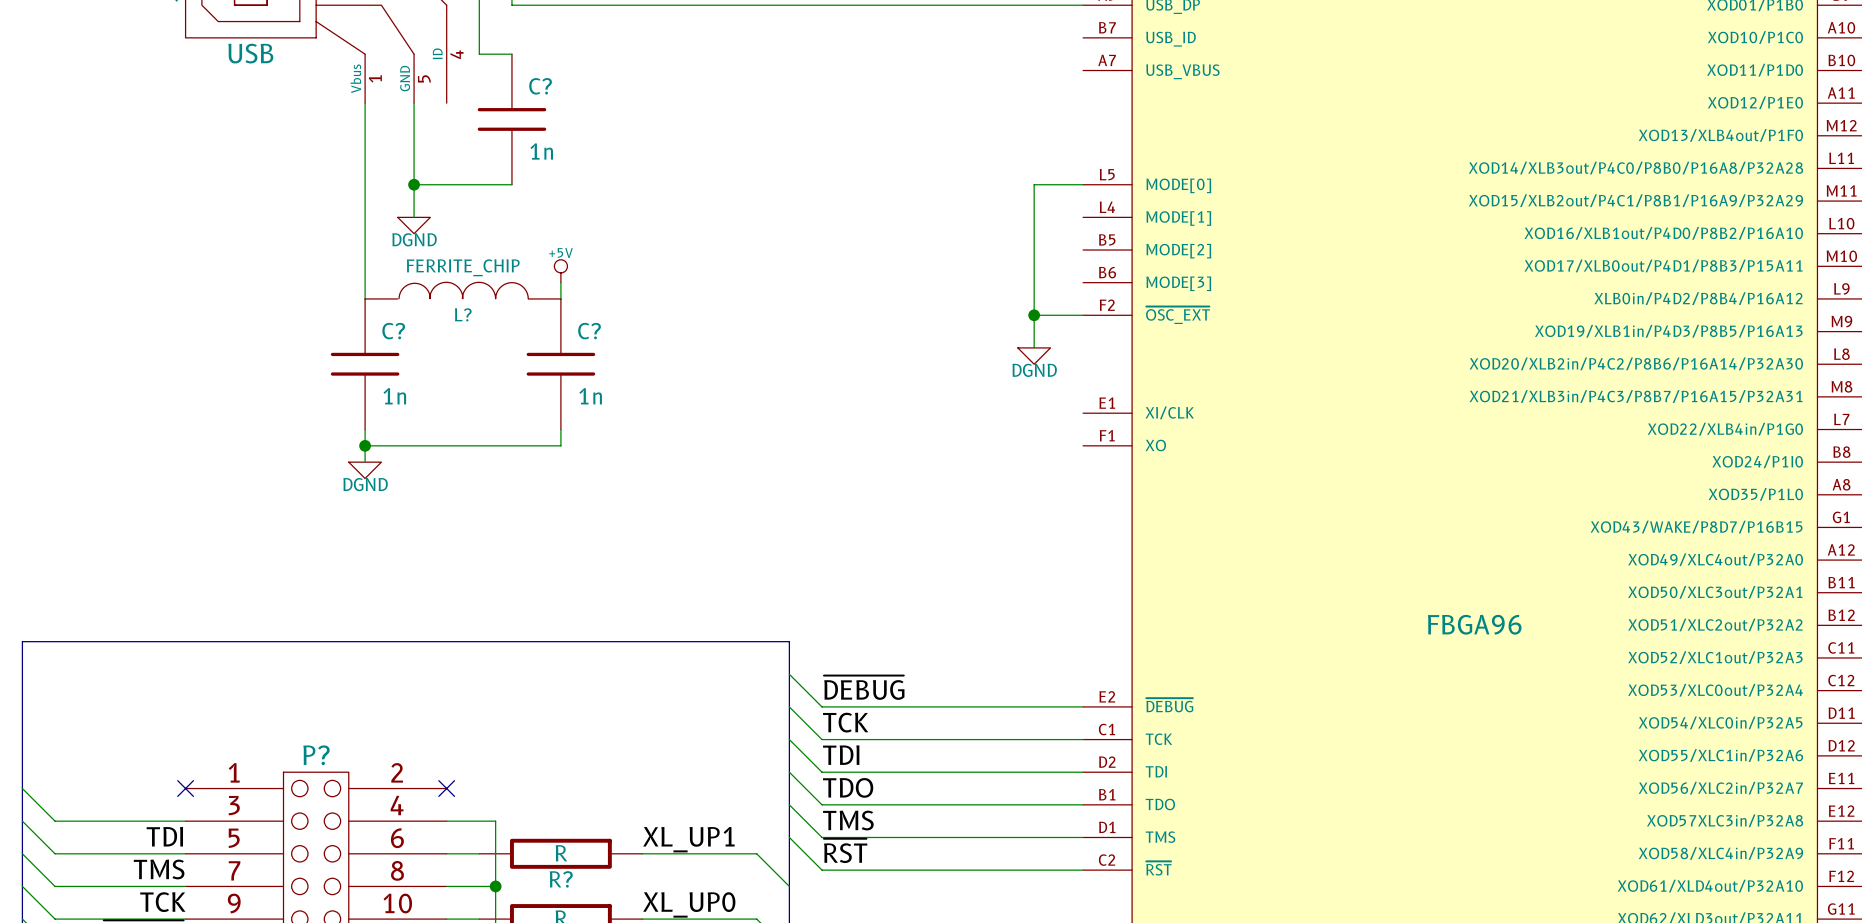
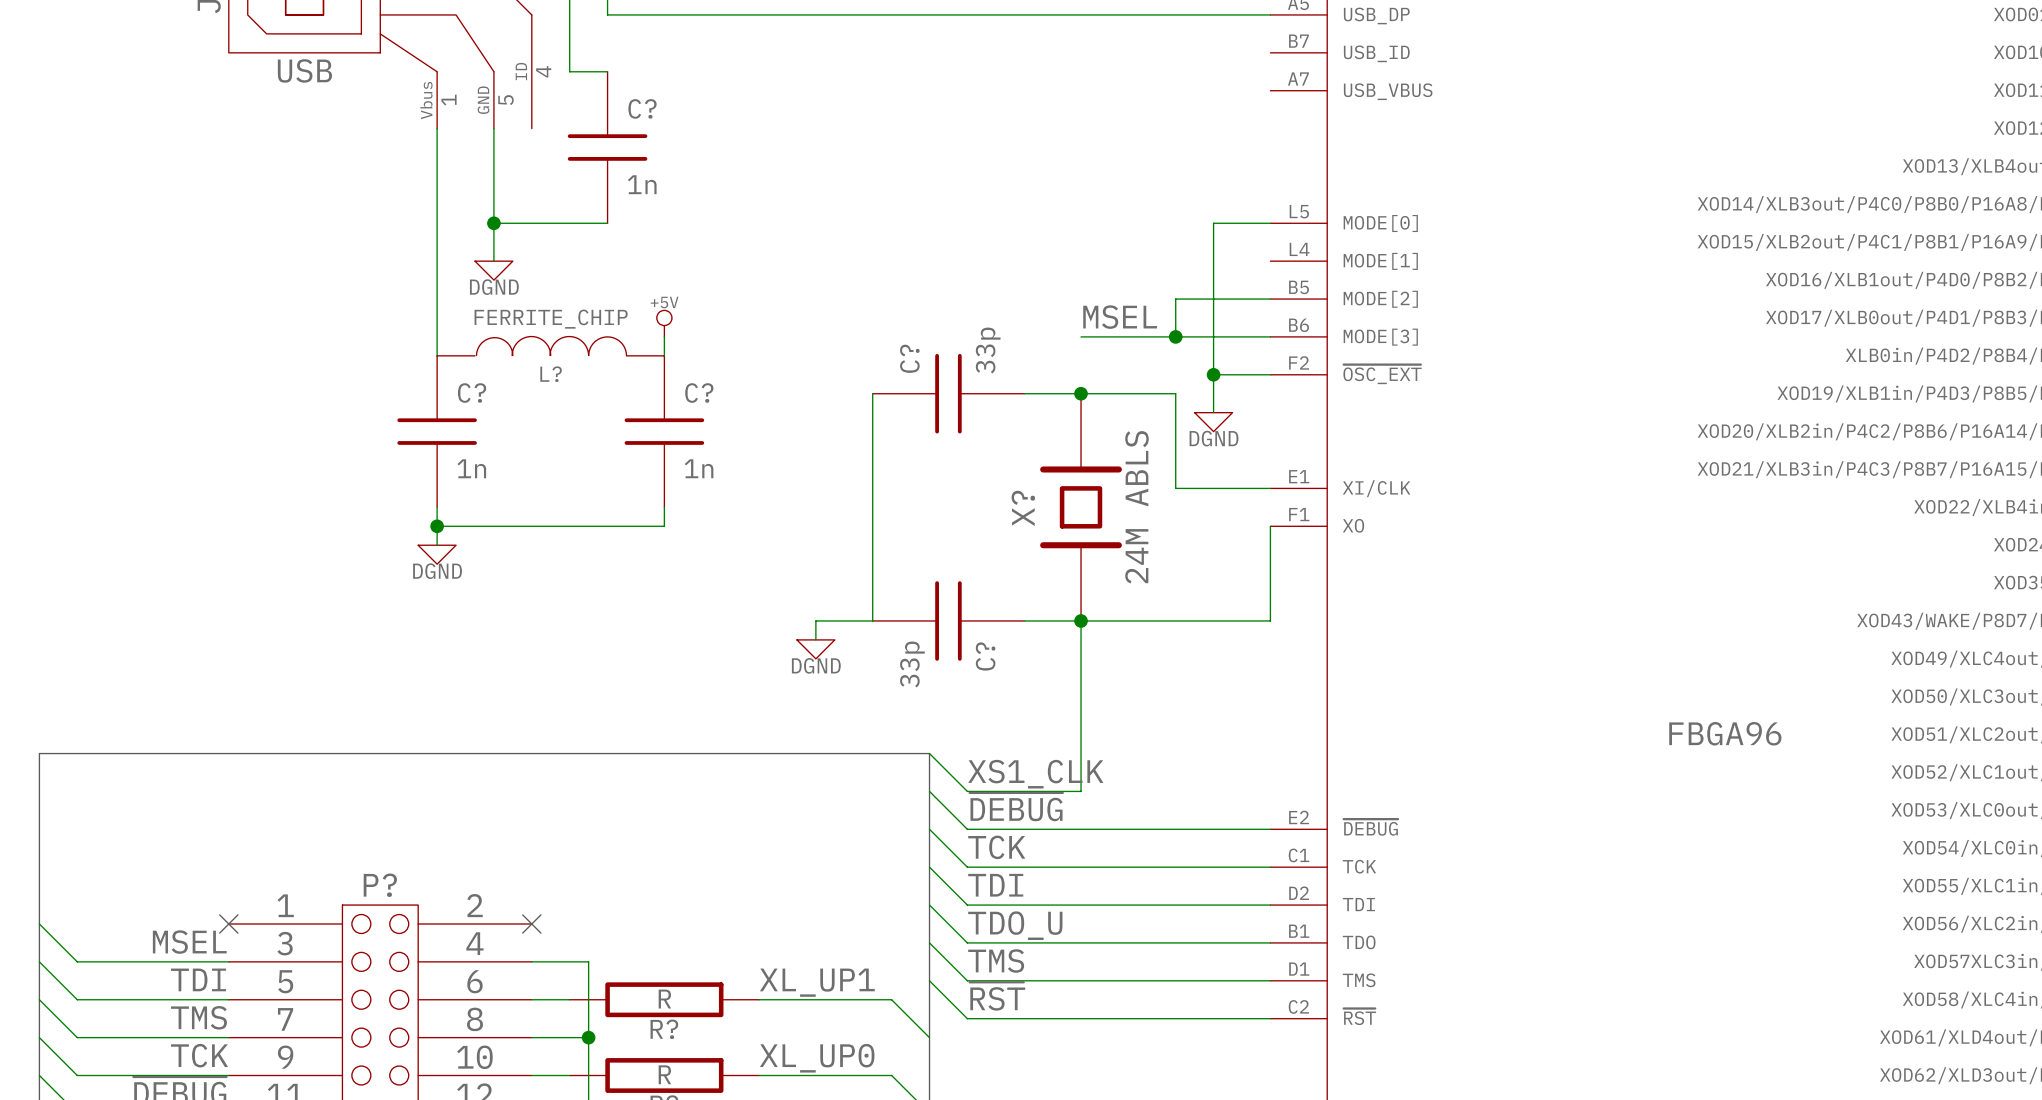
wire: none -> (1270, 299) (1175, 299) (1175, 336)
label: none -> MSEL (1120, 317)
wire: none -> (1081, 336) (1270, 336)
junction: none -> (1175, 336)
wire: none -> (872, 393) (872, 620) (815, 620) (815, 639)
C?: none -> 33p (948, 393)
wire: none -> (1024, 393) (1175, 393) (1175, 488) (1270, 488)
junction: none -> (1081, 393)
X?: none -> 24M ABLS (1081, 507)
wire: none -> (1270, 526) (1270, 620) (1024, 620)
C?: none -> 33p (948, 620)
wire: none -> (1081, 620) (1081, 791) (967, 791) (929, 753)
junction: none -> (1081, 620)
power symbol: none -> DGND (815, 649)
label: none -> XS1_CLK (1035, 774)
label: TDO (848, 787) -> TDO_U (1015, 925)
label: none -> MSEL (189, 942)

